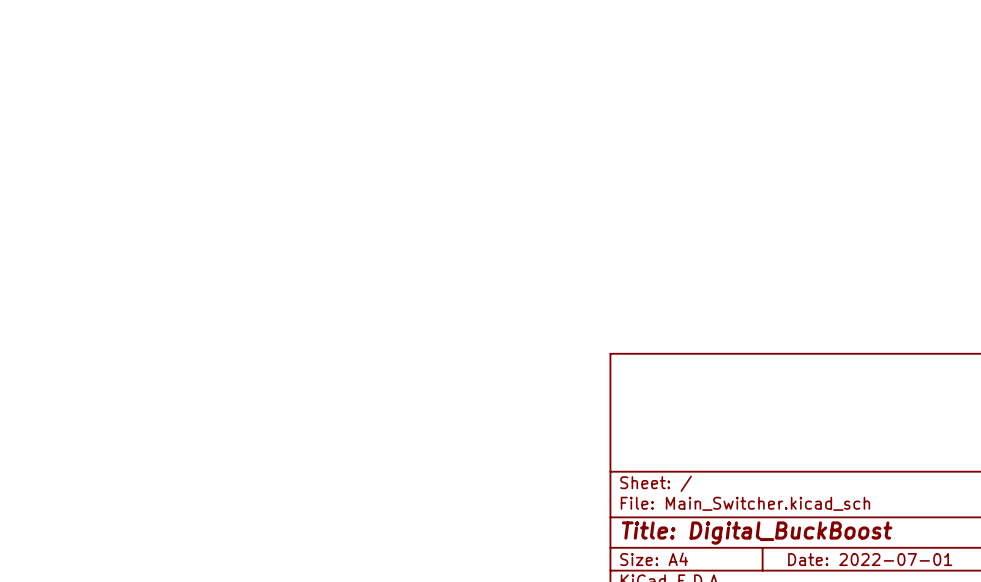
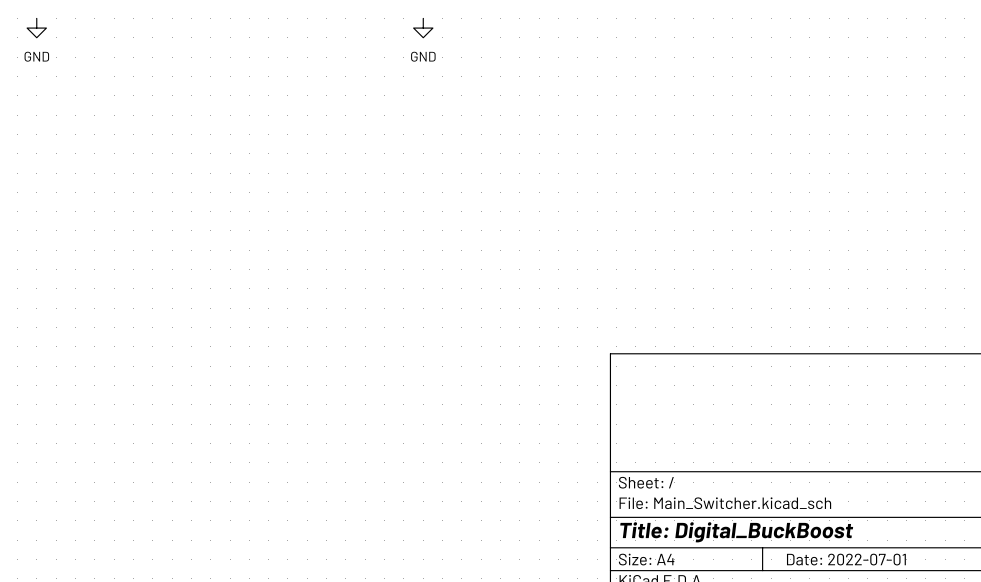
power symbol: none -> GND (36, 28)
power symbol: none -> GND (423, 28)

